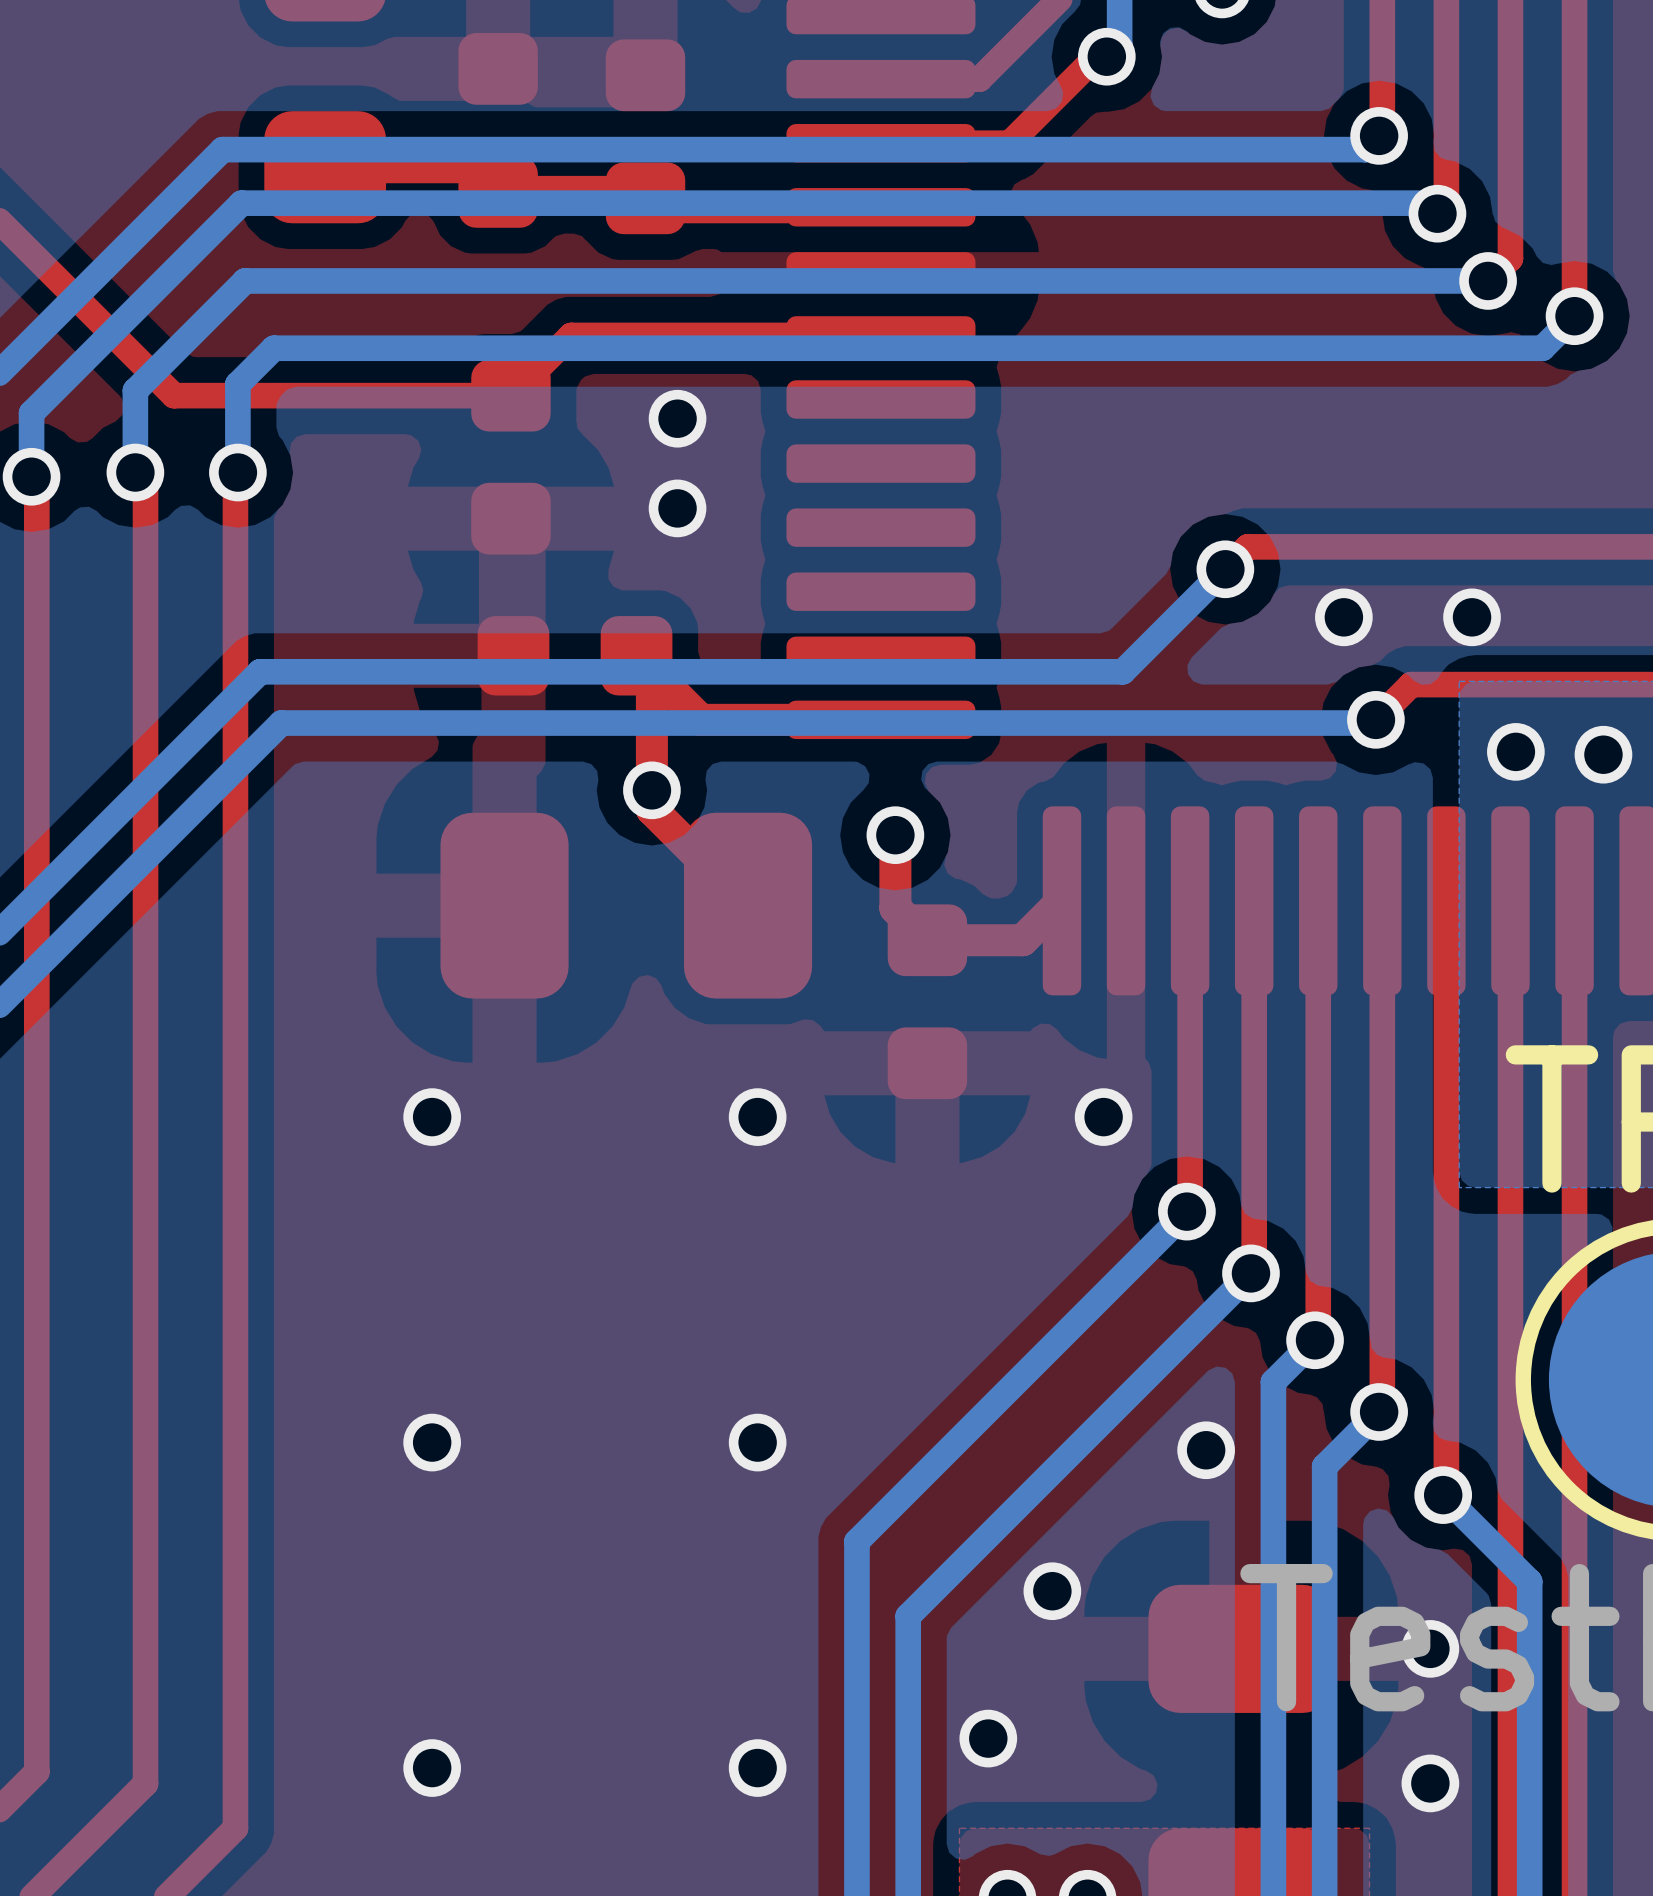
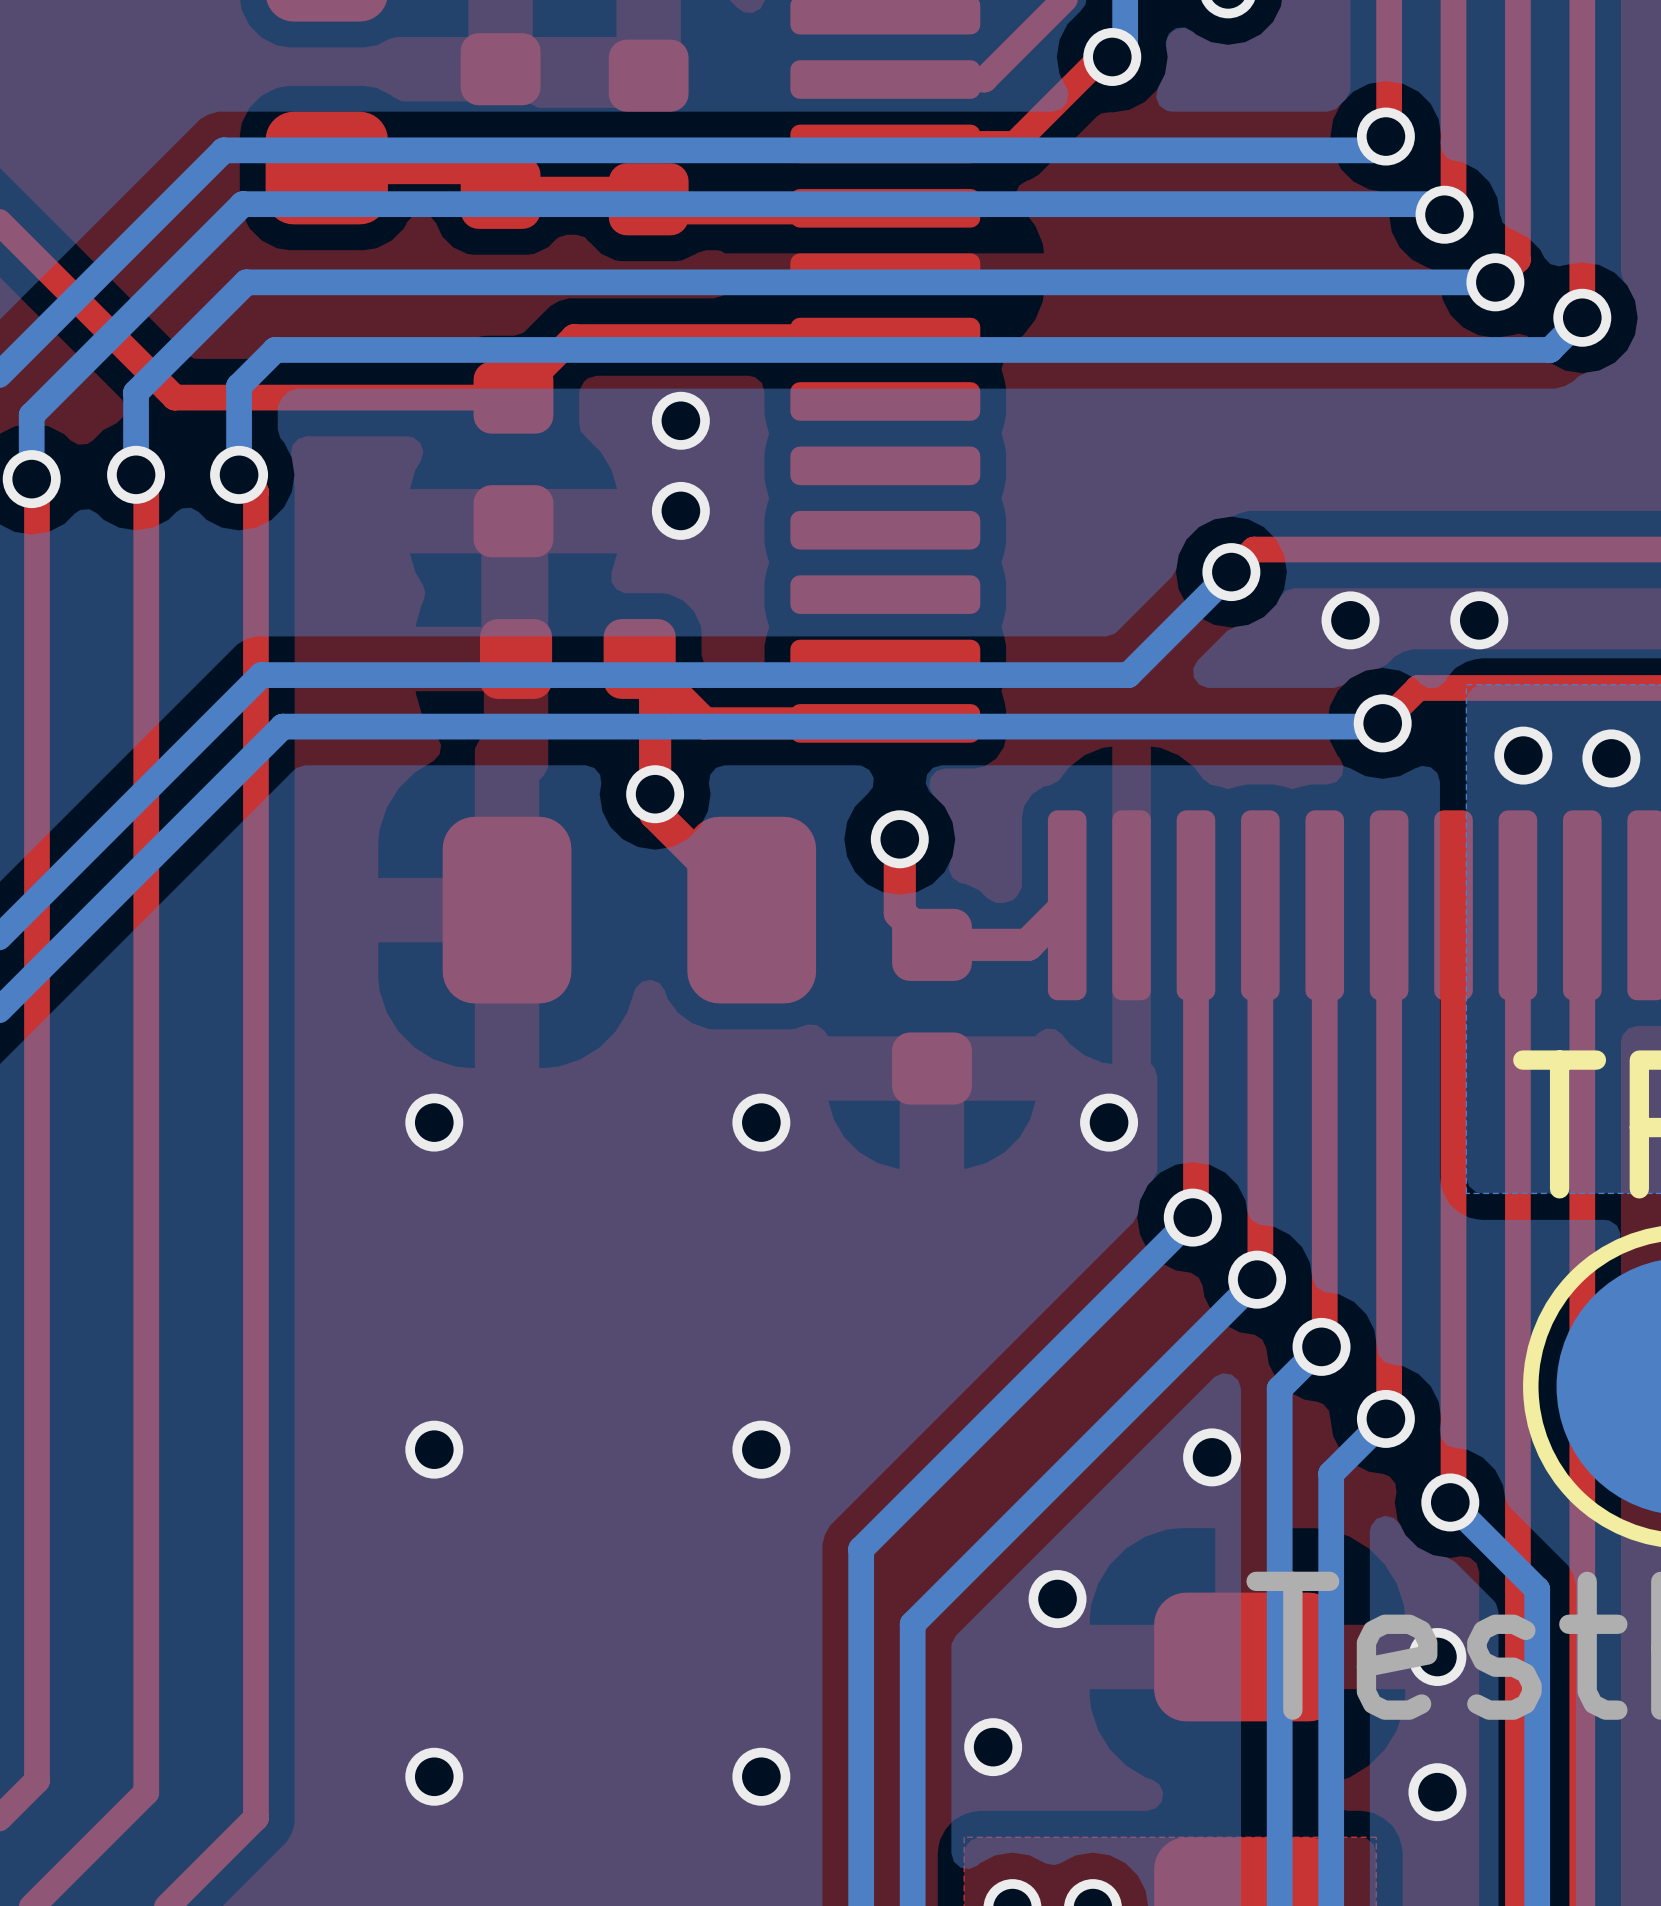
top track: (237, 472) (235, 474) (235, 1828) -> (239, 474) (255, 491) (255, 1817) (236, 1837)

